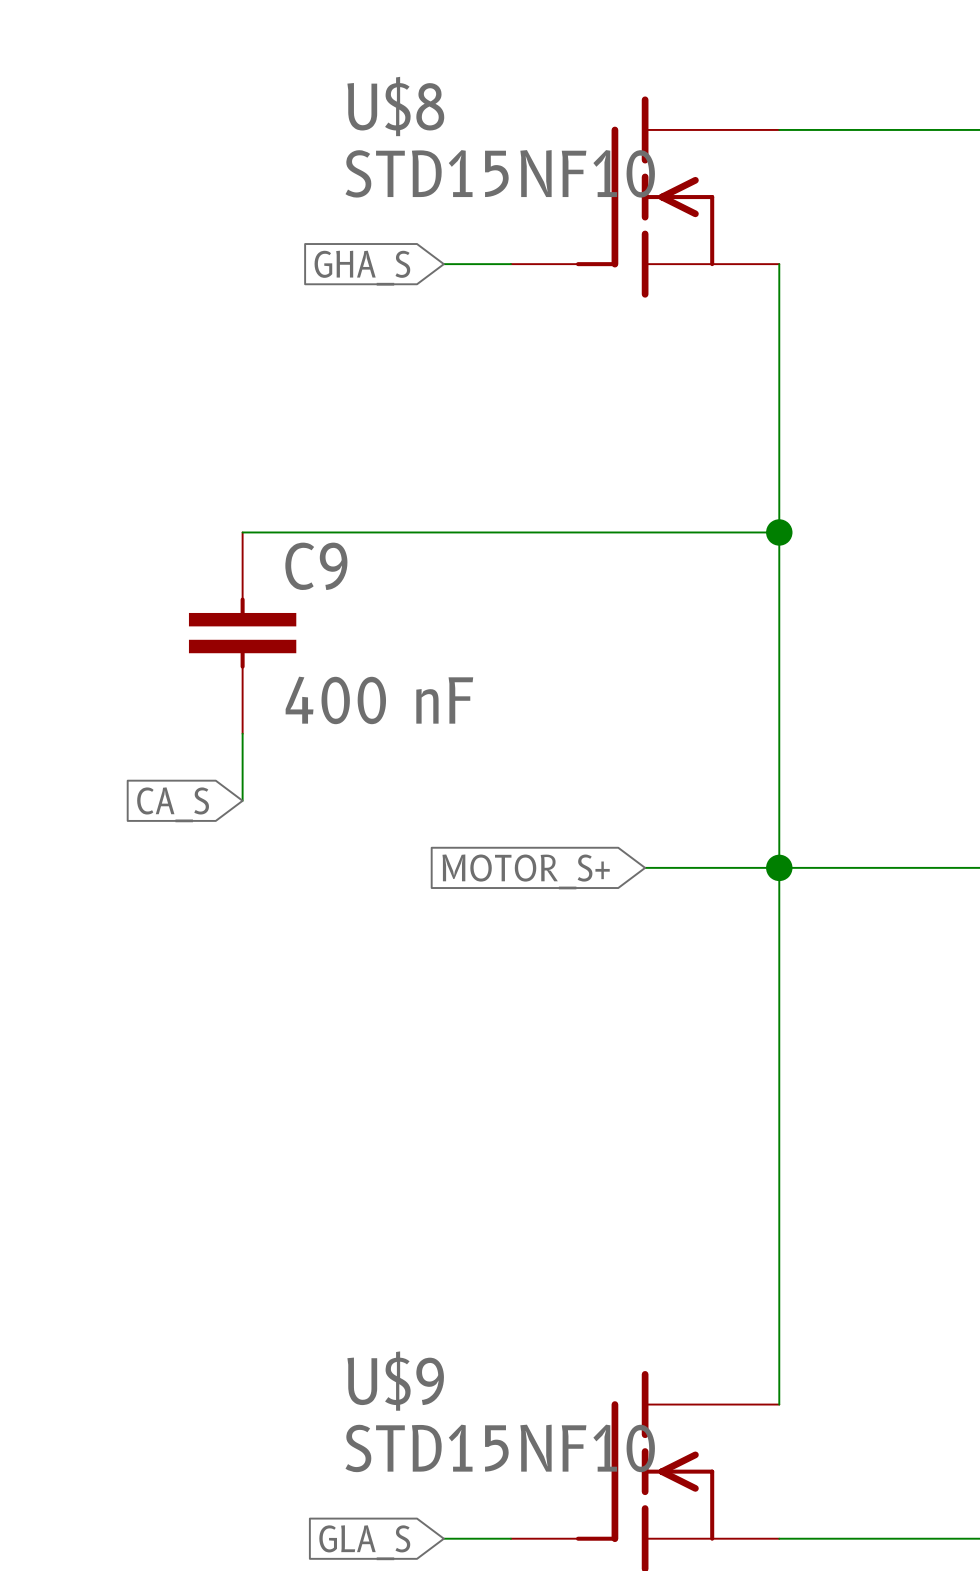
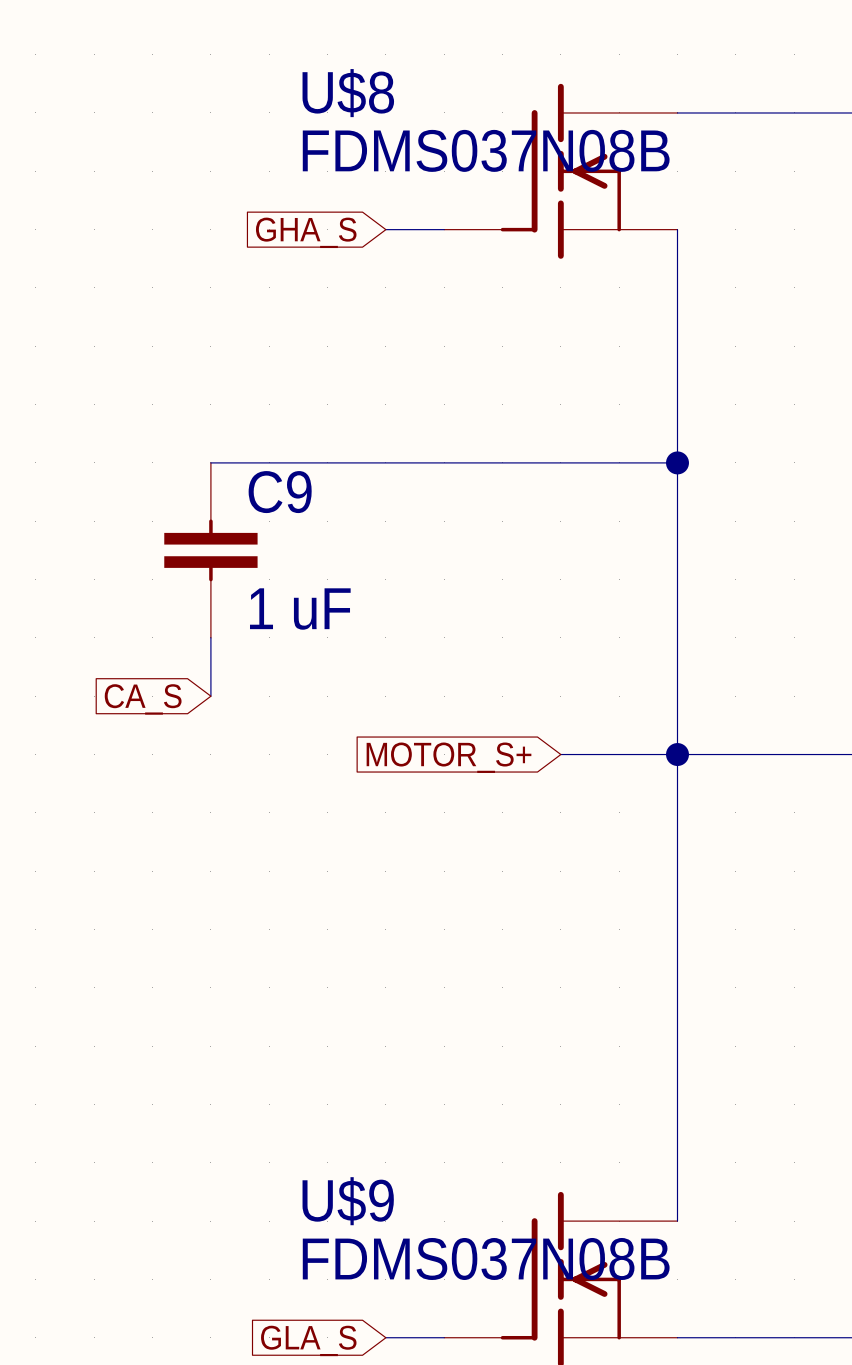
U$8 value: STD15NF10 (500, 173) -> FDMS037N08B (486, 150)
C9 value: 400 nF (379, 700) -> 1 uF (300, 609)
U$9 value: STD15NF10 (500, 1448) -> FDMS037N08B (486, 1258)

